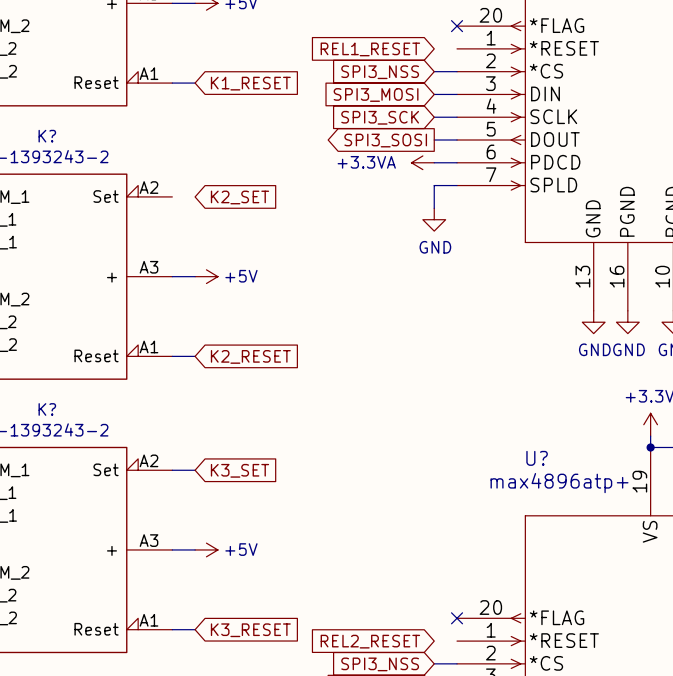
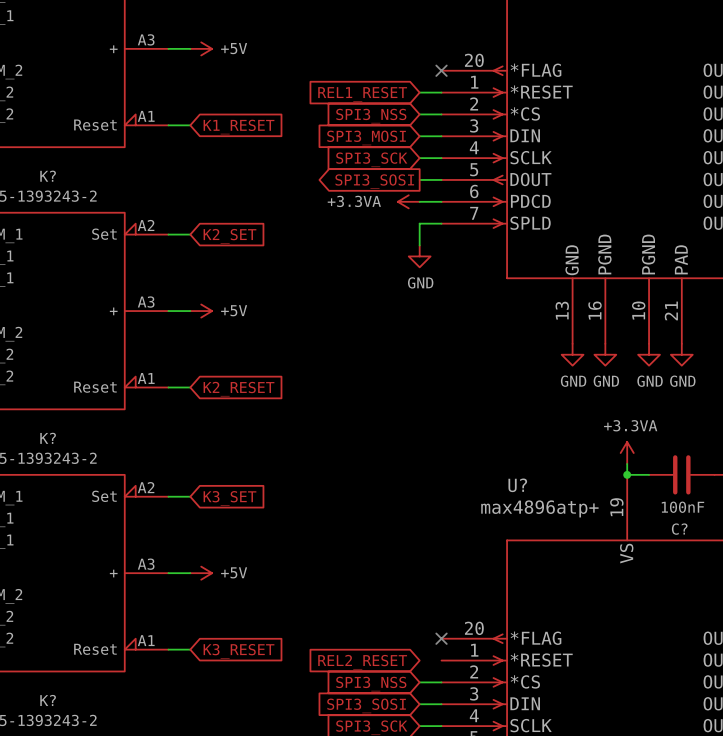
wire: none -> (419, 92) (441, 92)
wire: none -> (168, 234) (190, 234)

